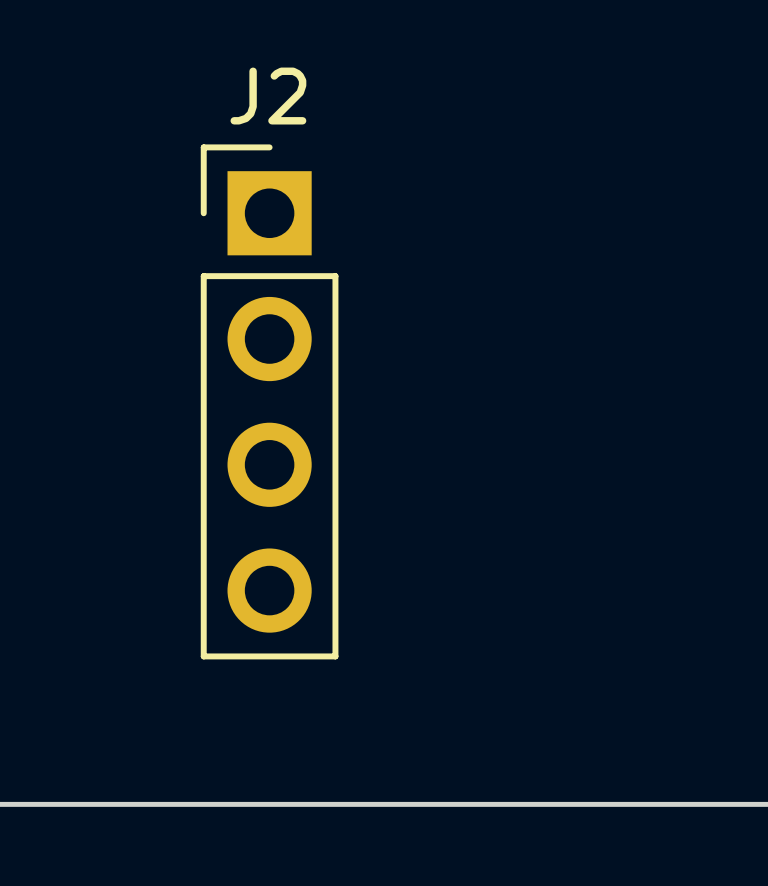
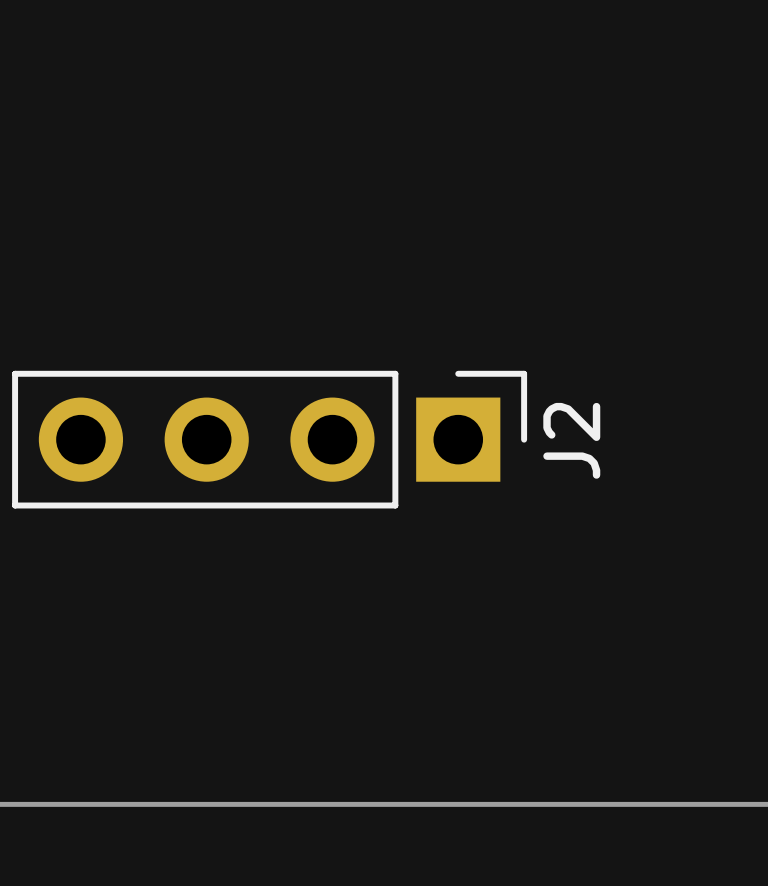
J2 rotation: 0° (269, 401) -> 90° clockwise (269, 439)

